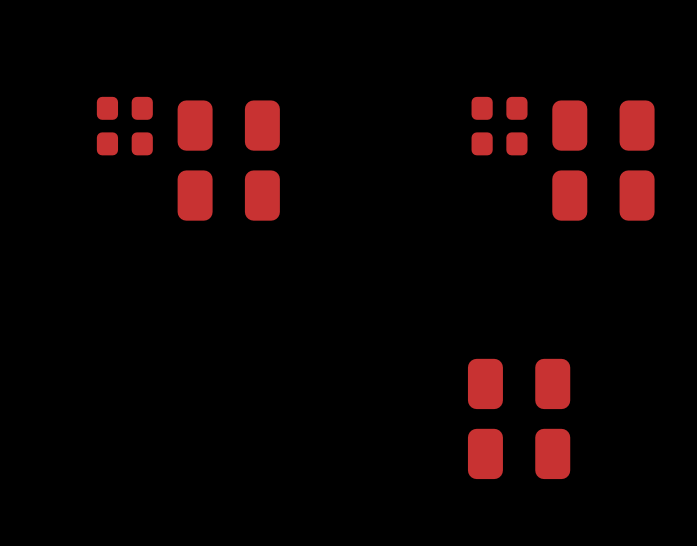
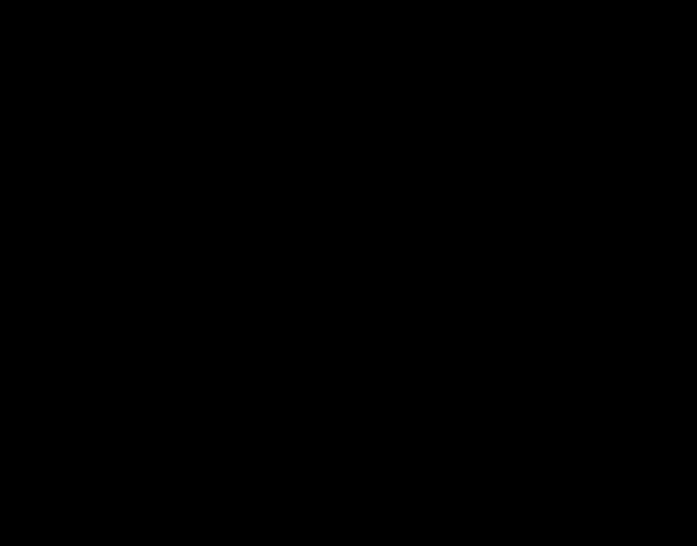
part: (124, 108) -> none
part: (499, 108) -> none
part: (228, 125) -> none
part: (603, 125) -> none
part: (124, 143) -> none
part: (499, 143) -> none
part: (228, 195) -> none
part: (603, 195) -> none
part: (519, 383) -> none
part: (519, 453) -> none

